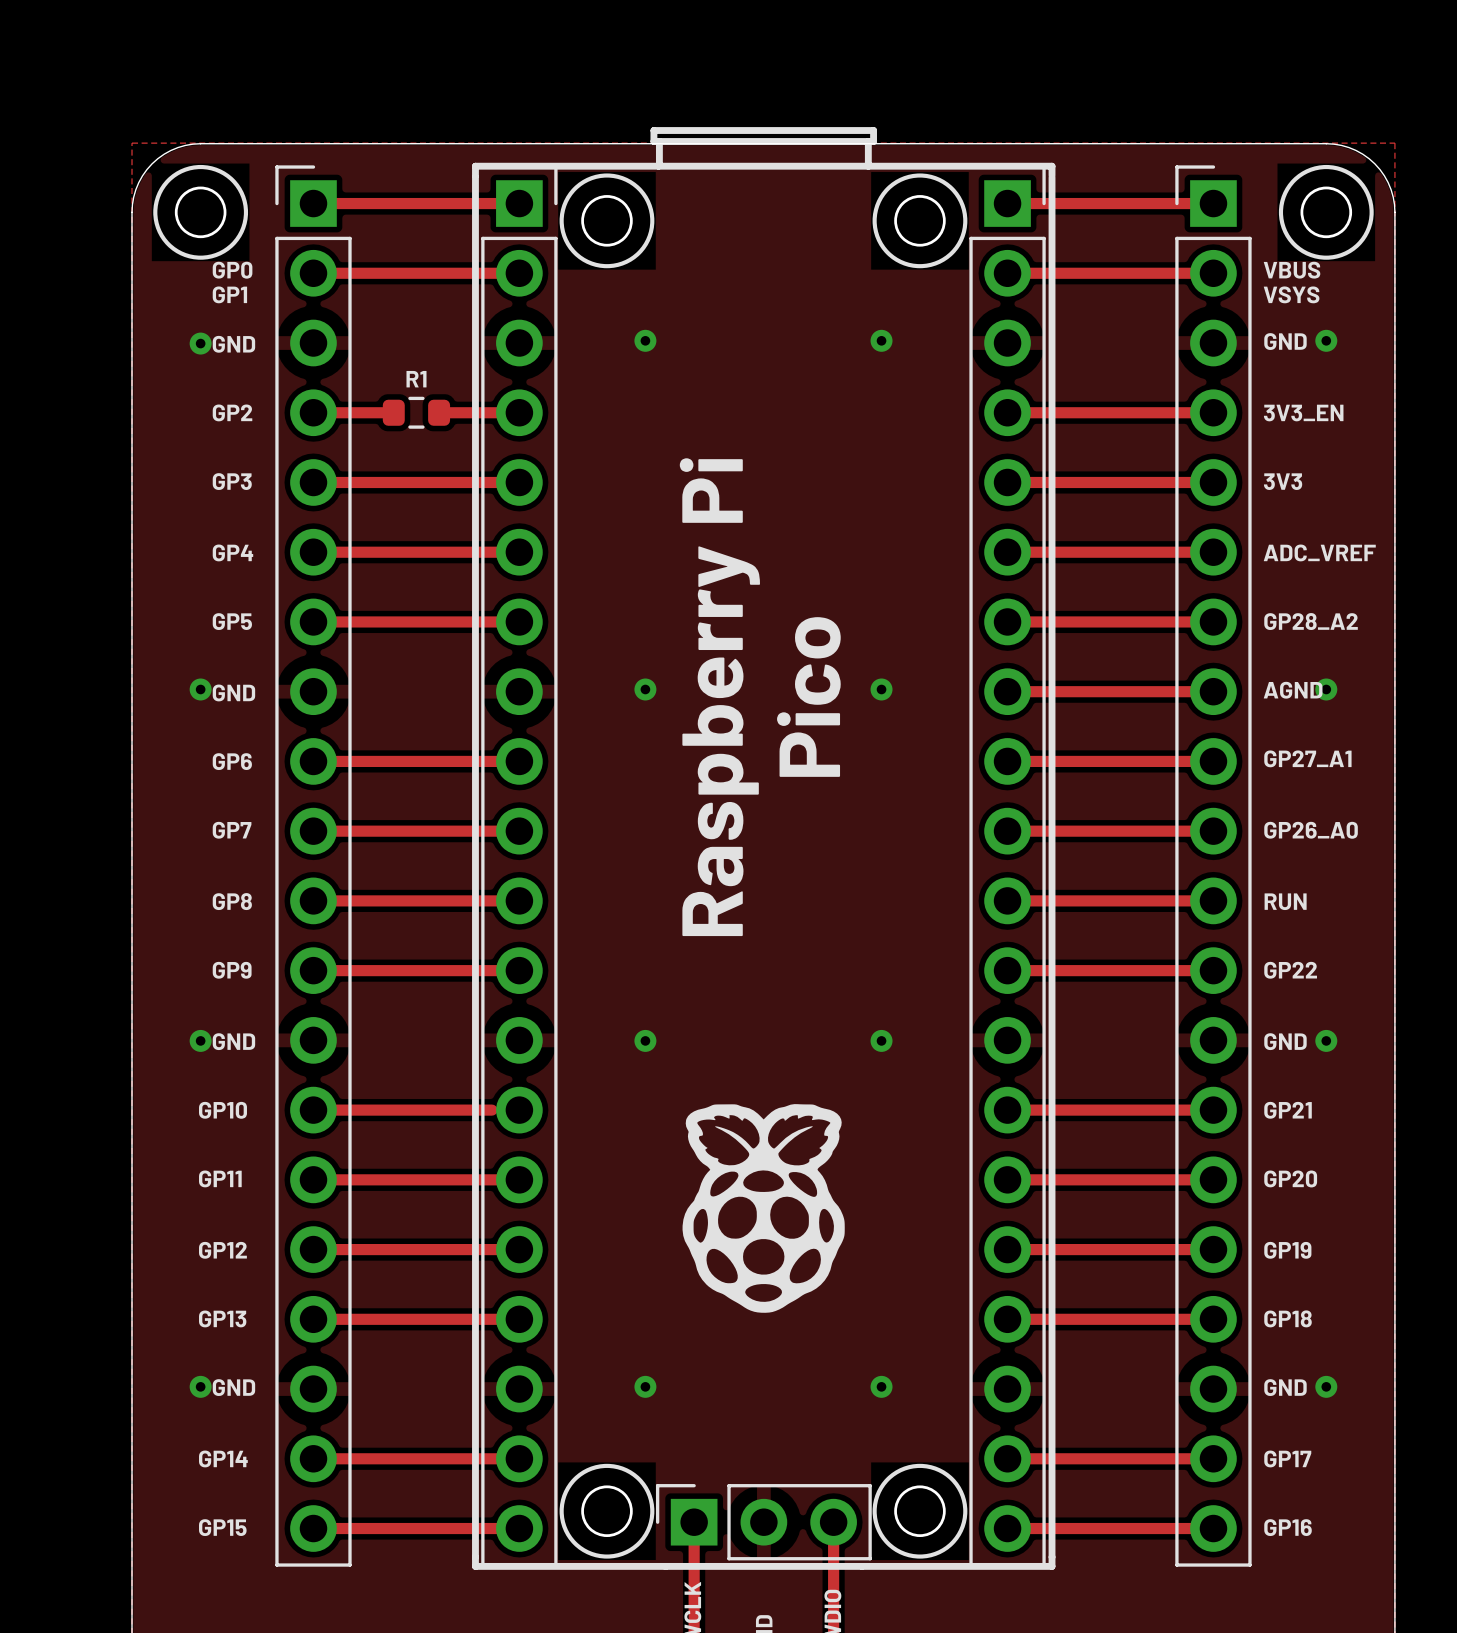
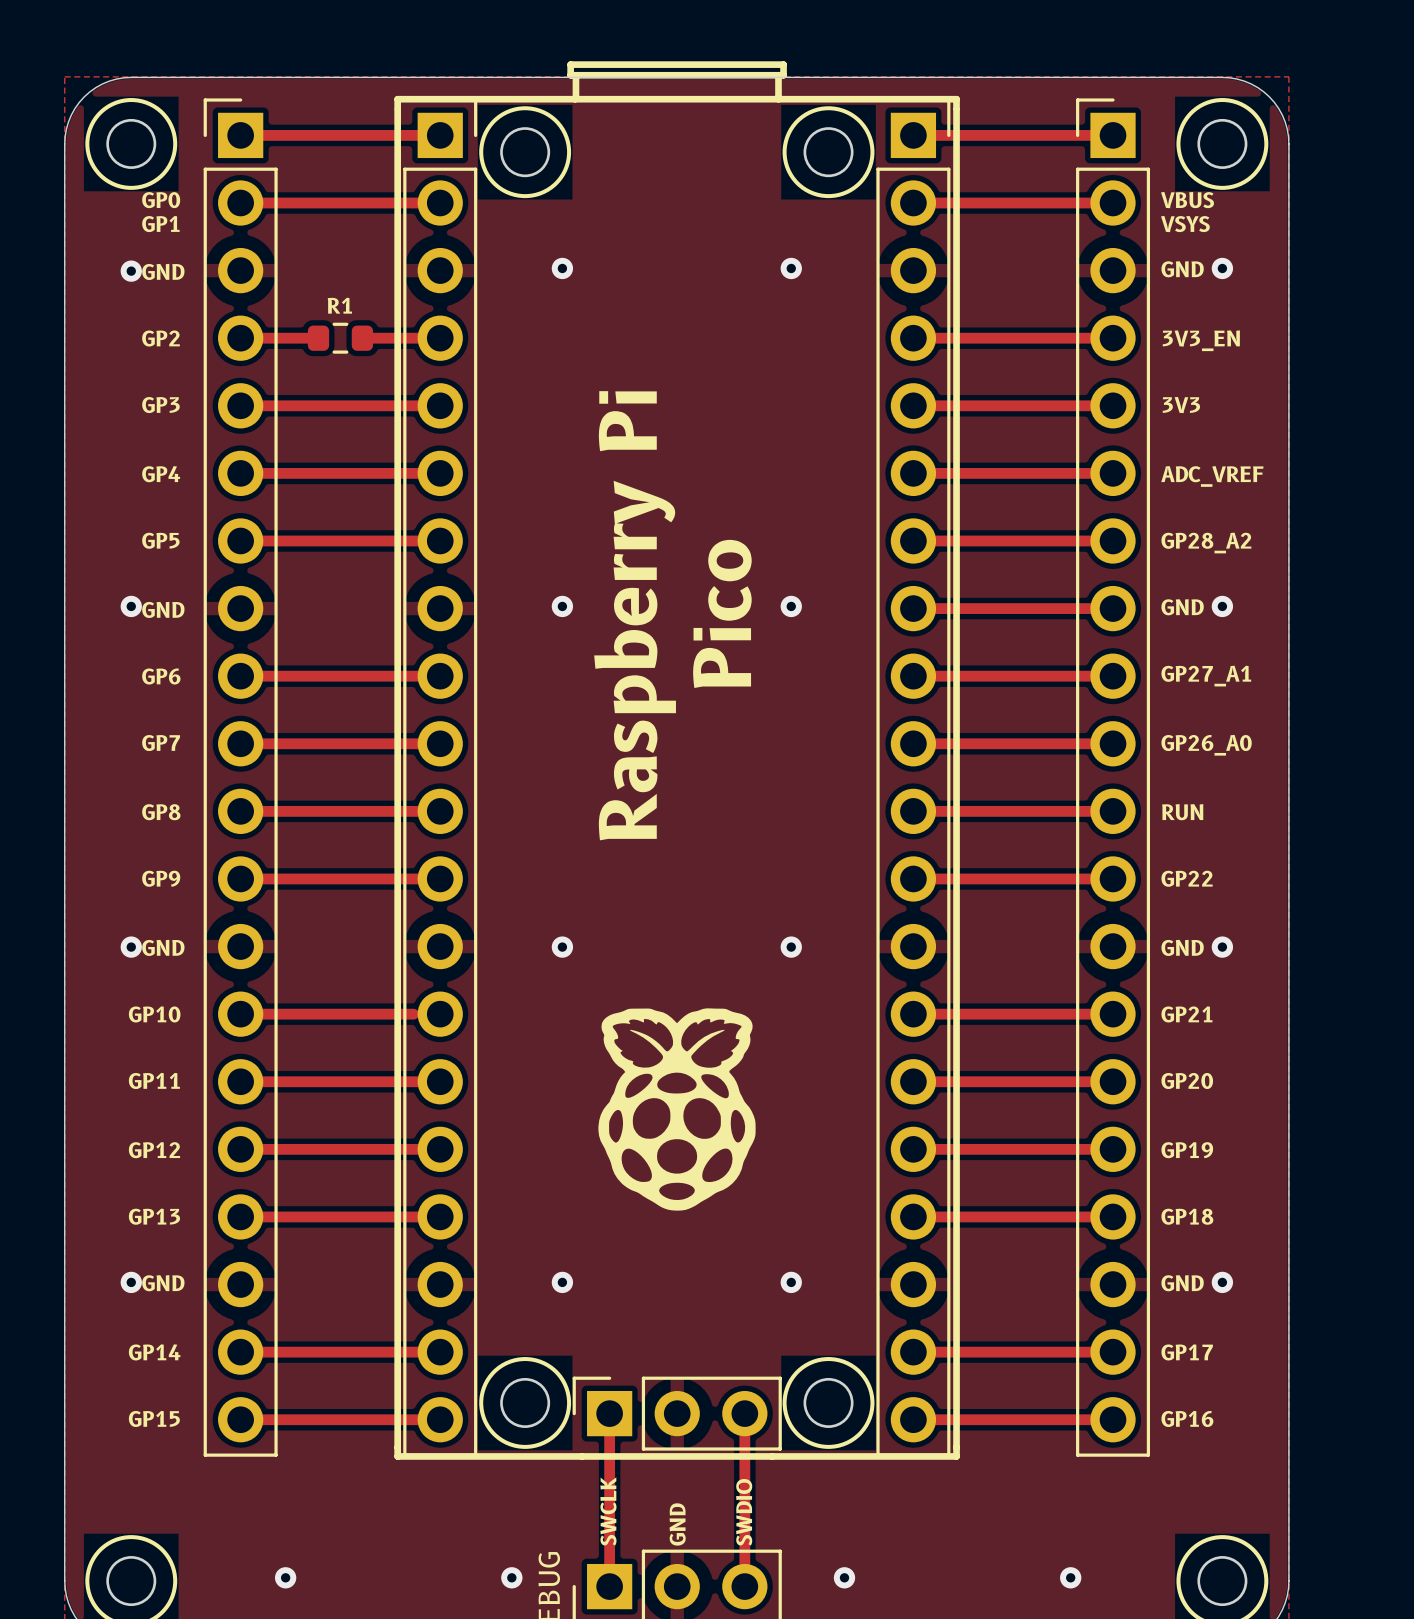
text: AGND (1293, 690) -> GND (1182, 607)

